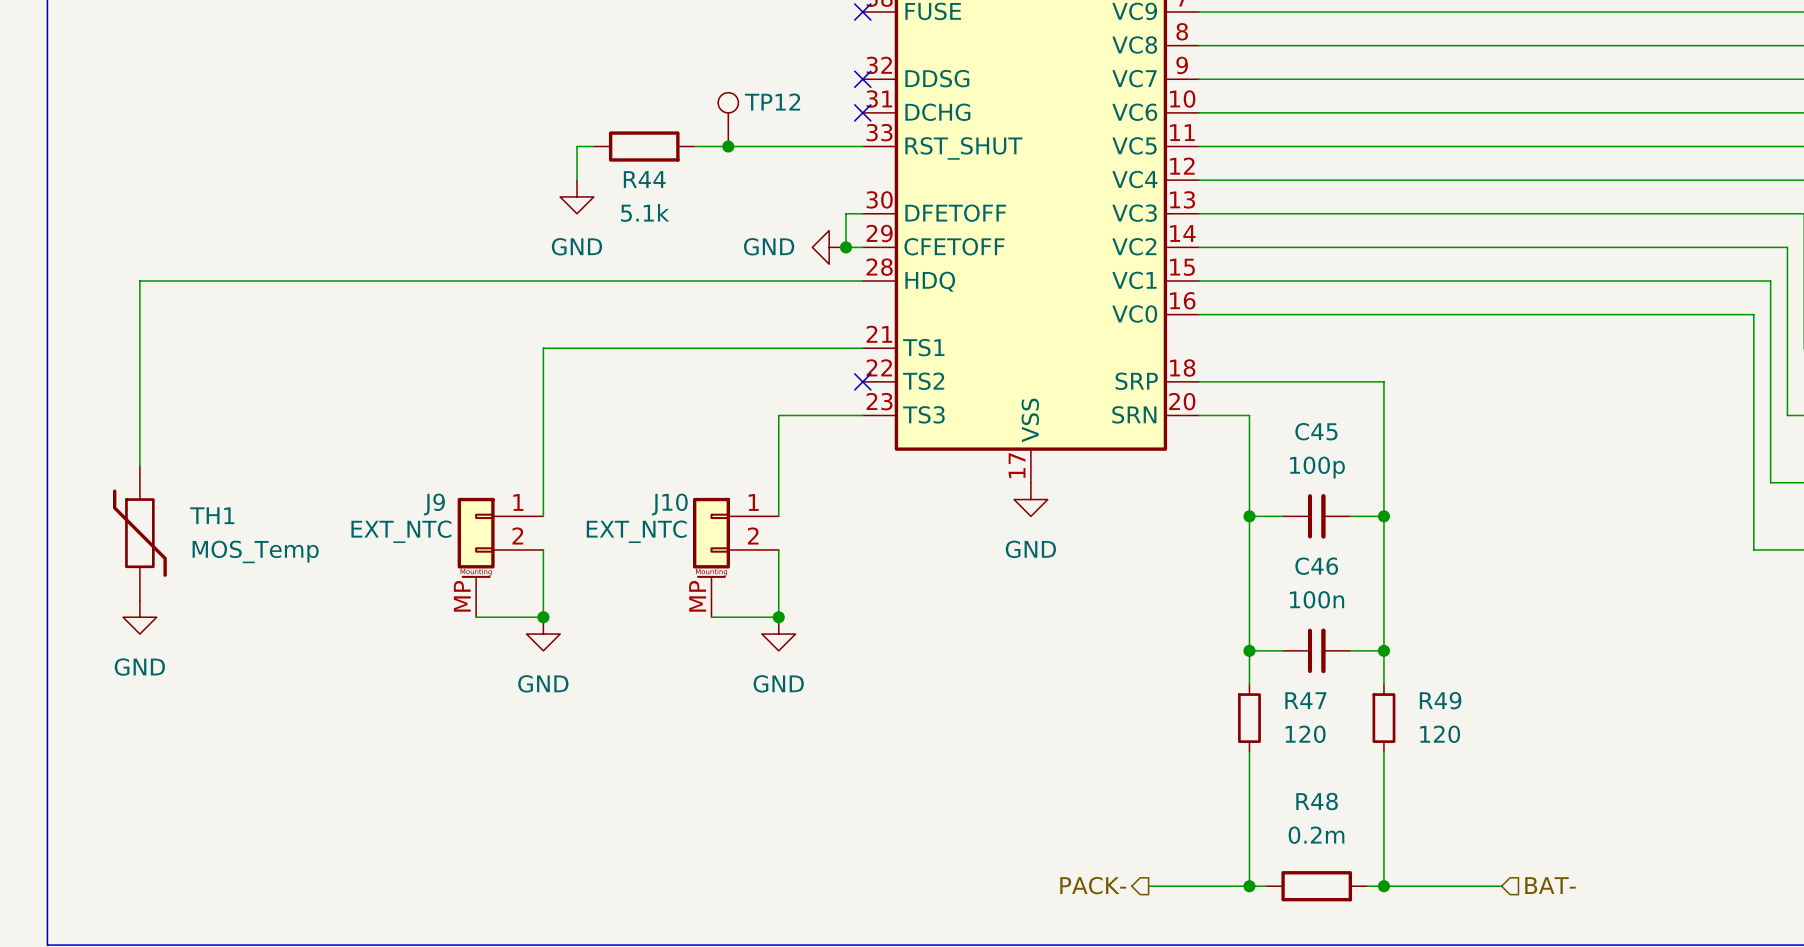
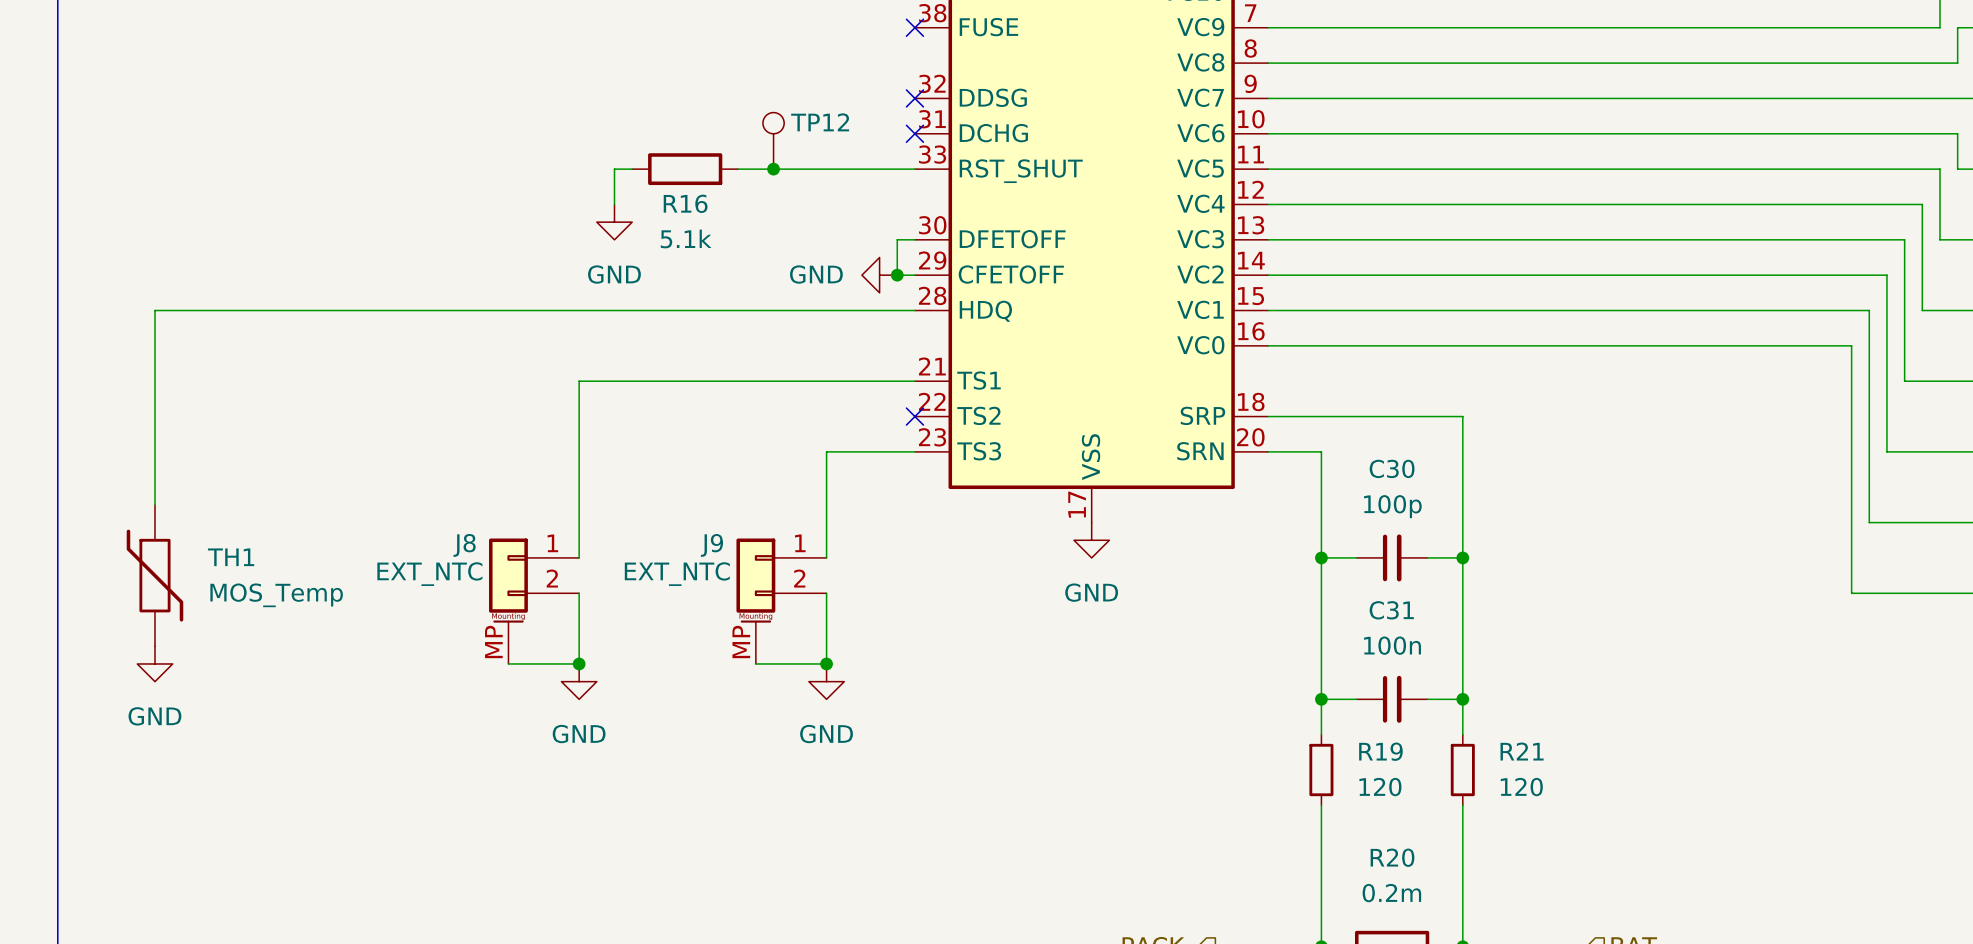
R44 name: R44 (644, 179) -> R16 (685, 203)
C45 name: C45 (1316, 431) -> C30 (1392, 468)
J9 name: J9 (434, 504) -> J8 (464, 545)
J10 name: J10 (669, 504) -> J9 (711, 545)
C46 name: C46 (1316, 566) -> C31 (1391, 610)
R47 name: R47 (1305, 700) -> R19 (1380, 751)
R49 name: R49 (1440, 700) -> R21 (1522, 751)
R48 name: R48 (1317, 801) -> R20 (1392, 857)

